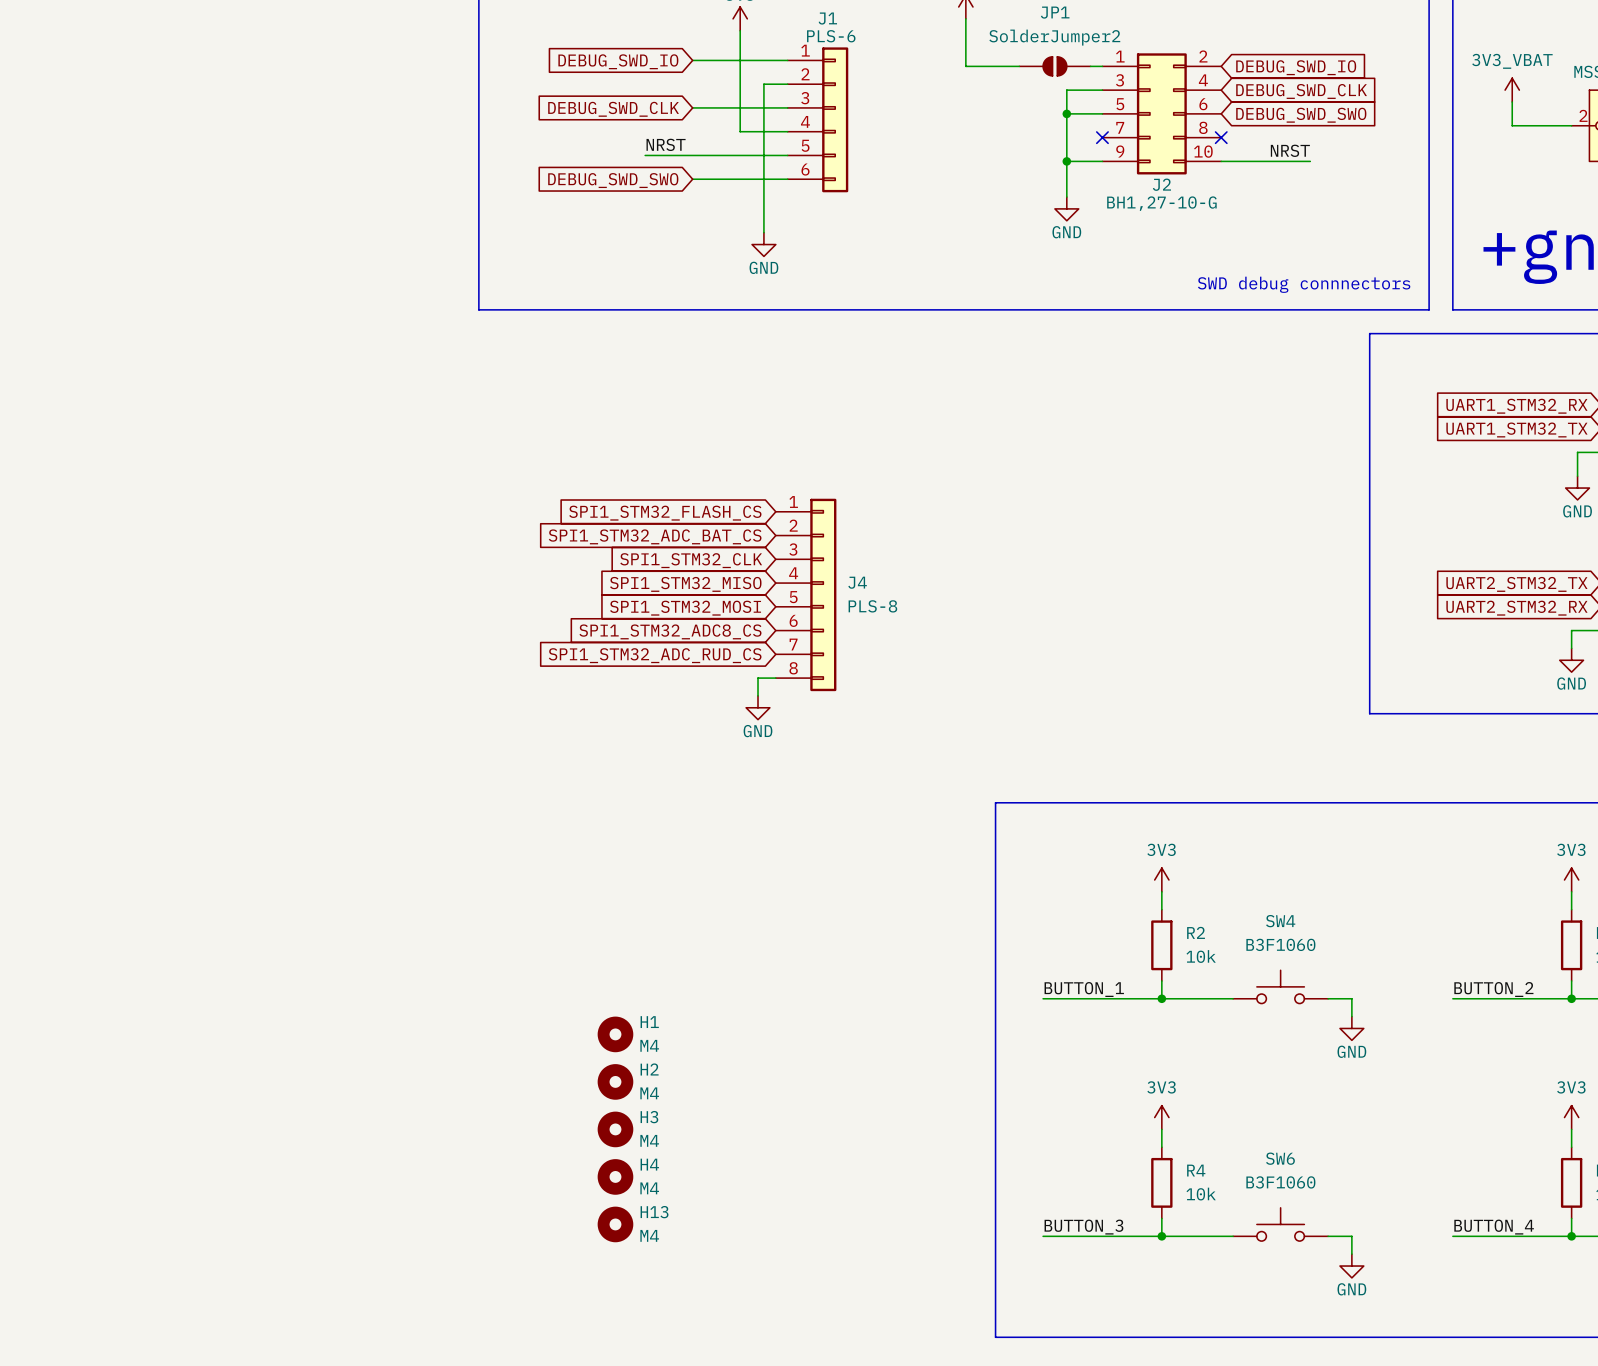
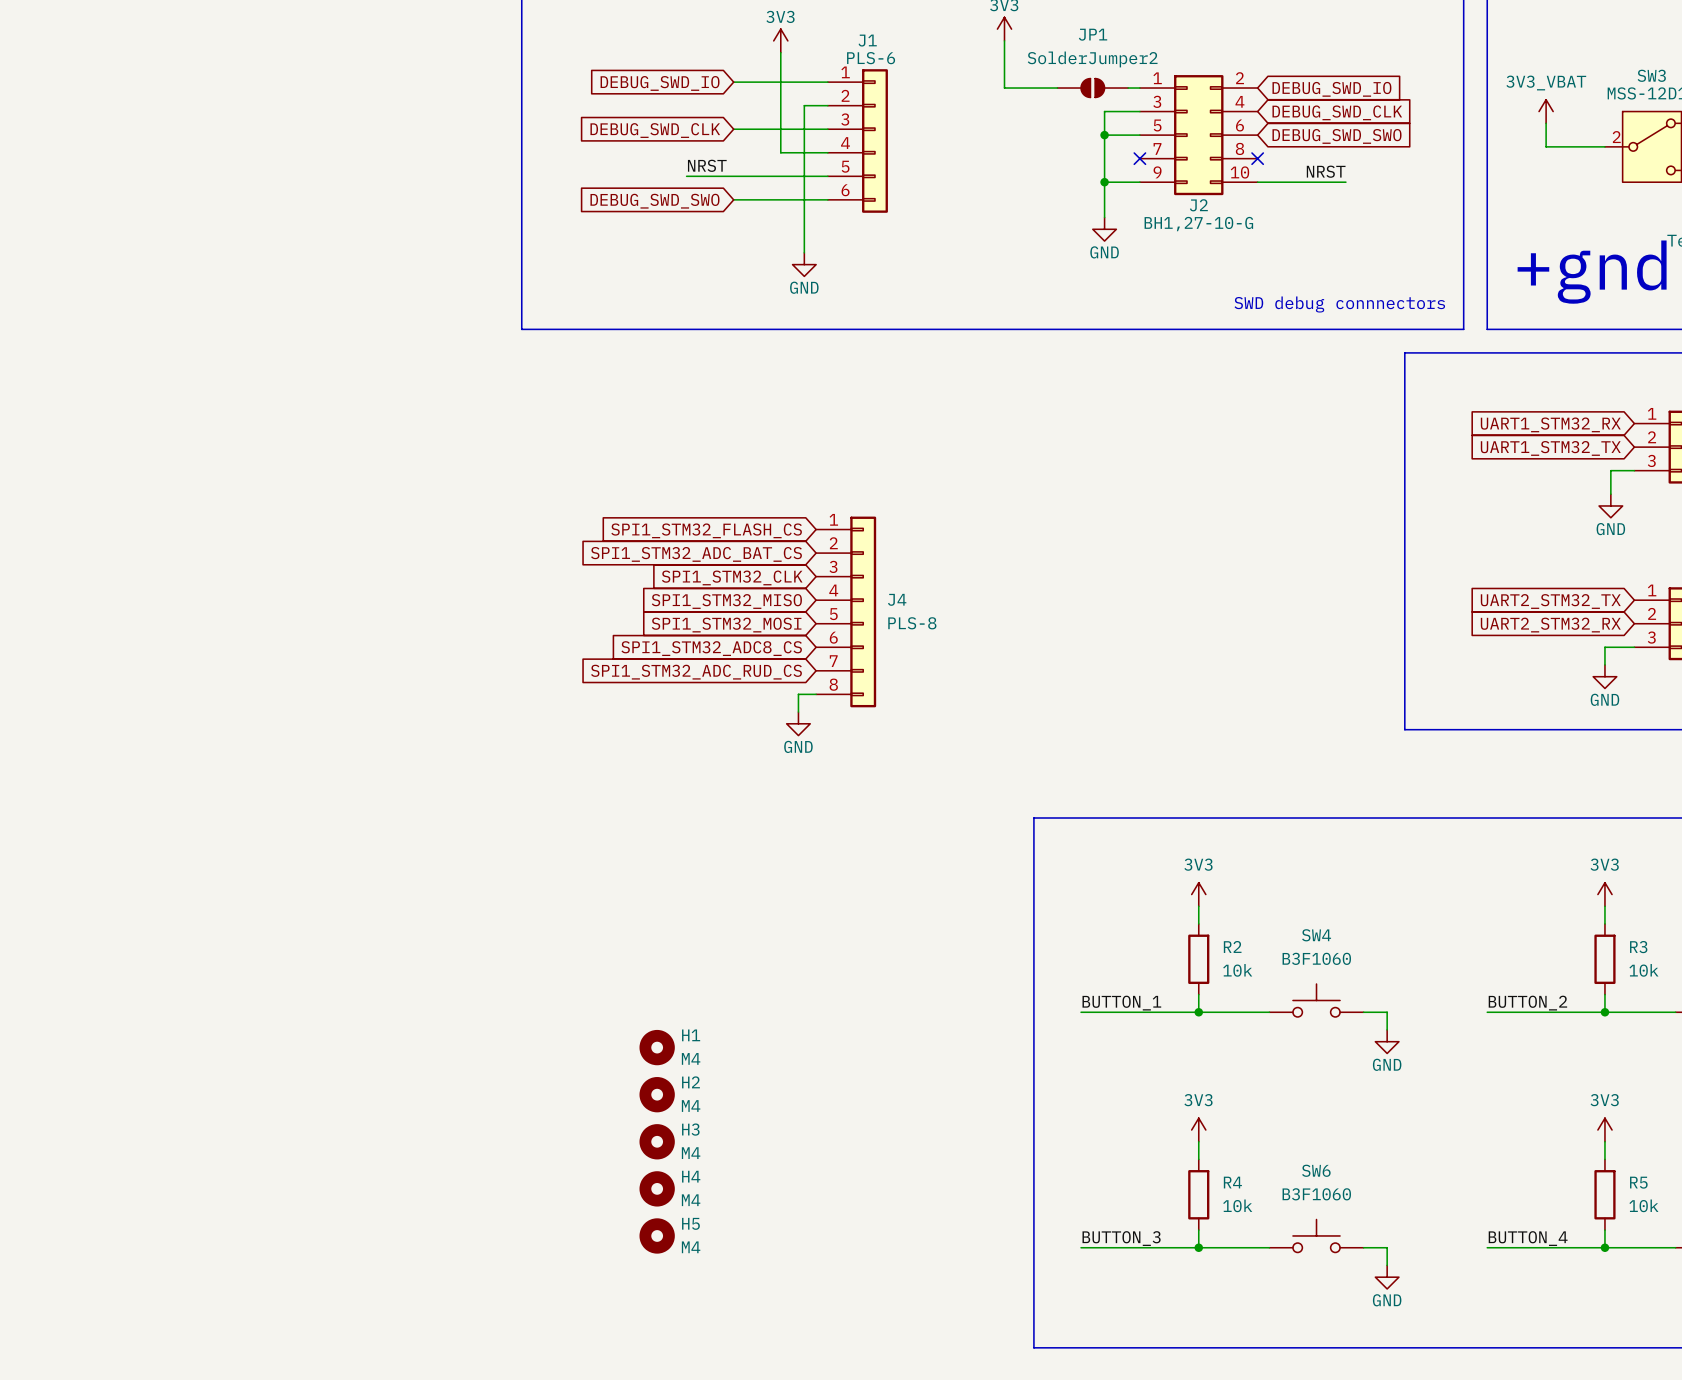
H13 name: H13 (654, 1212) -> H5 (690, 1223)

